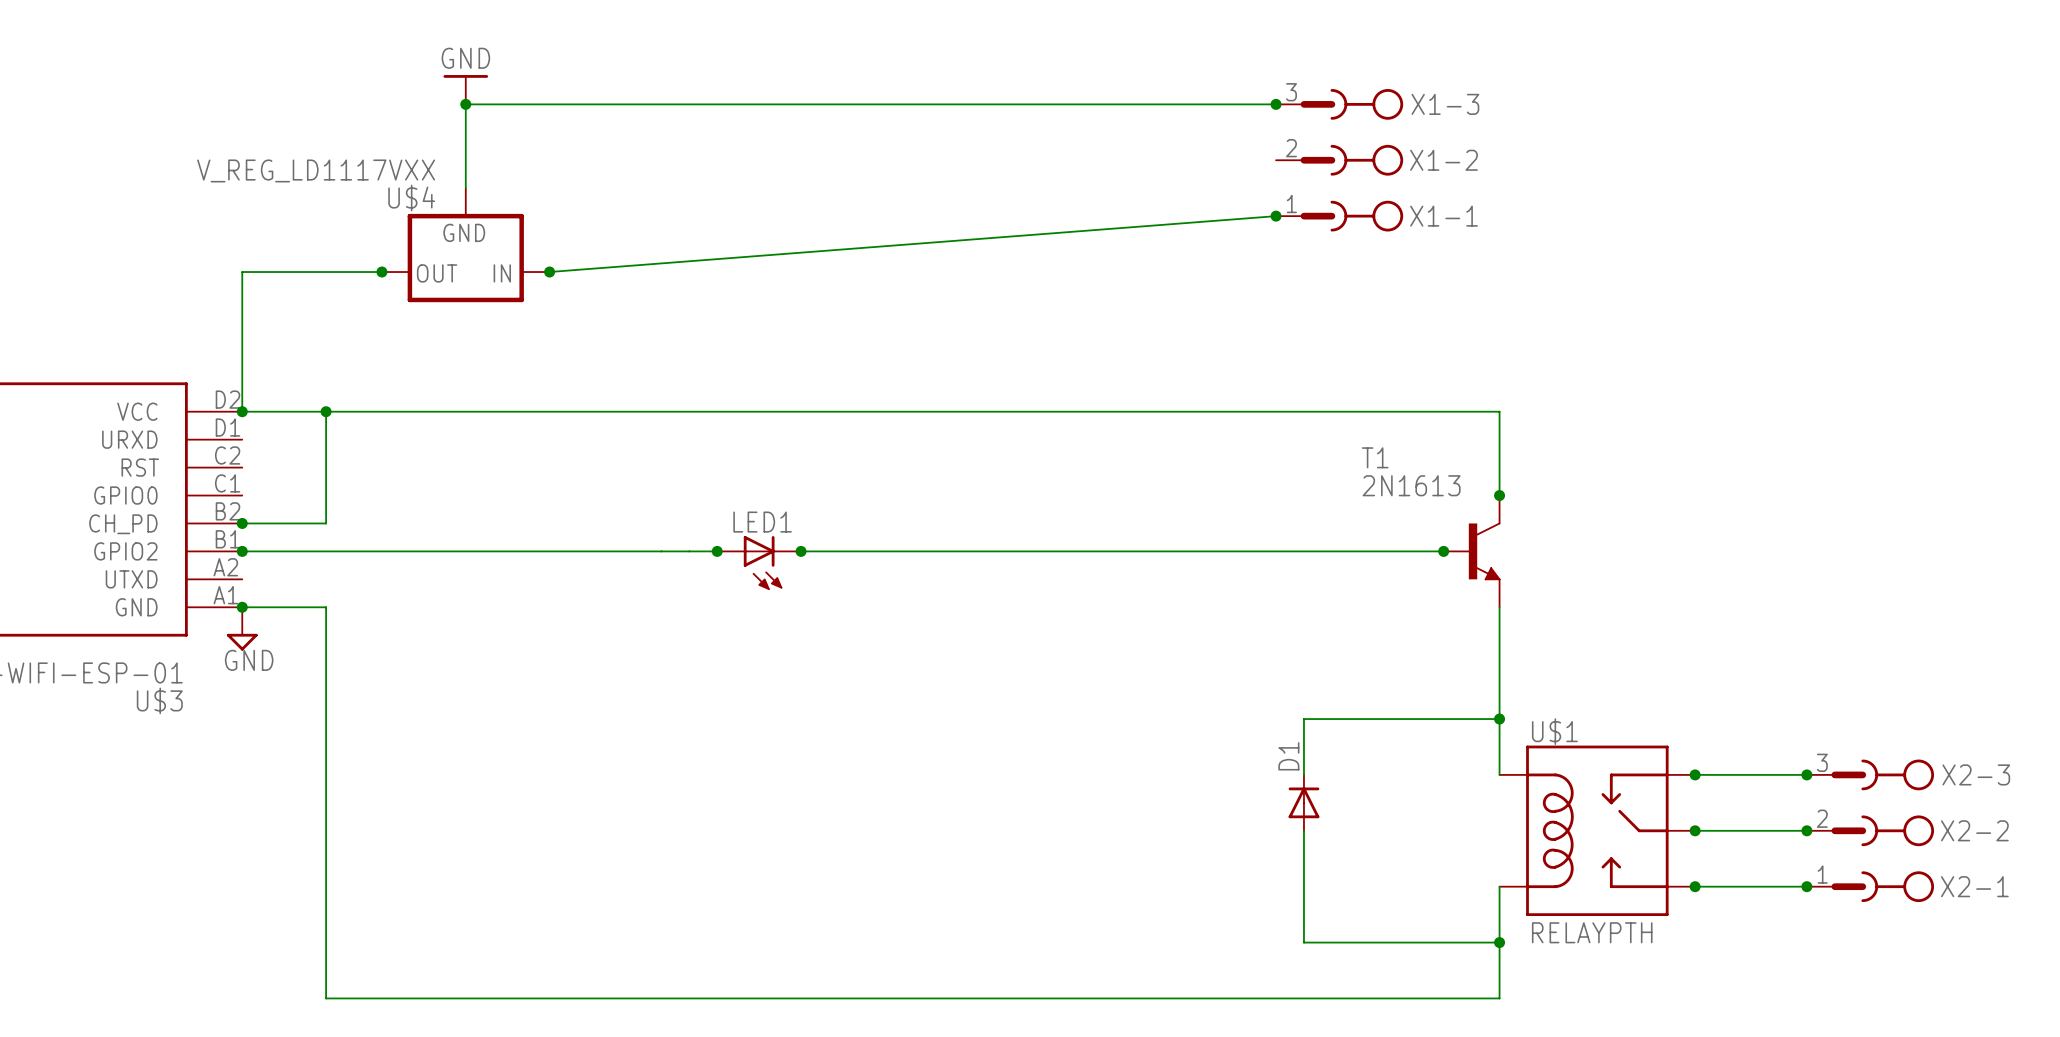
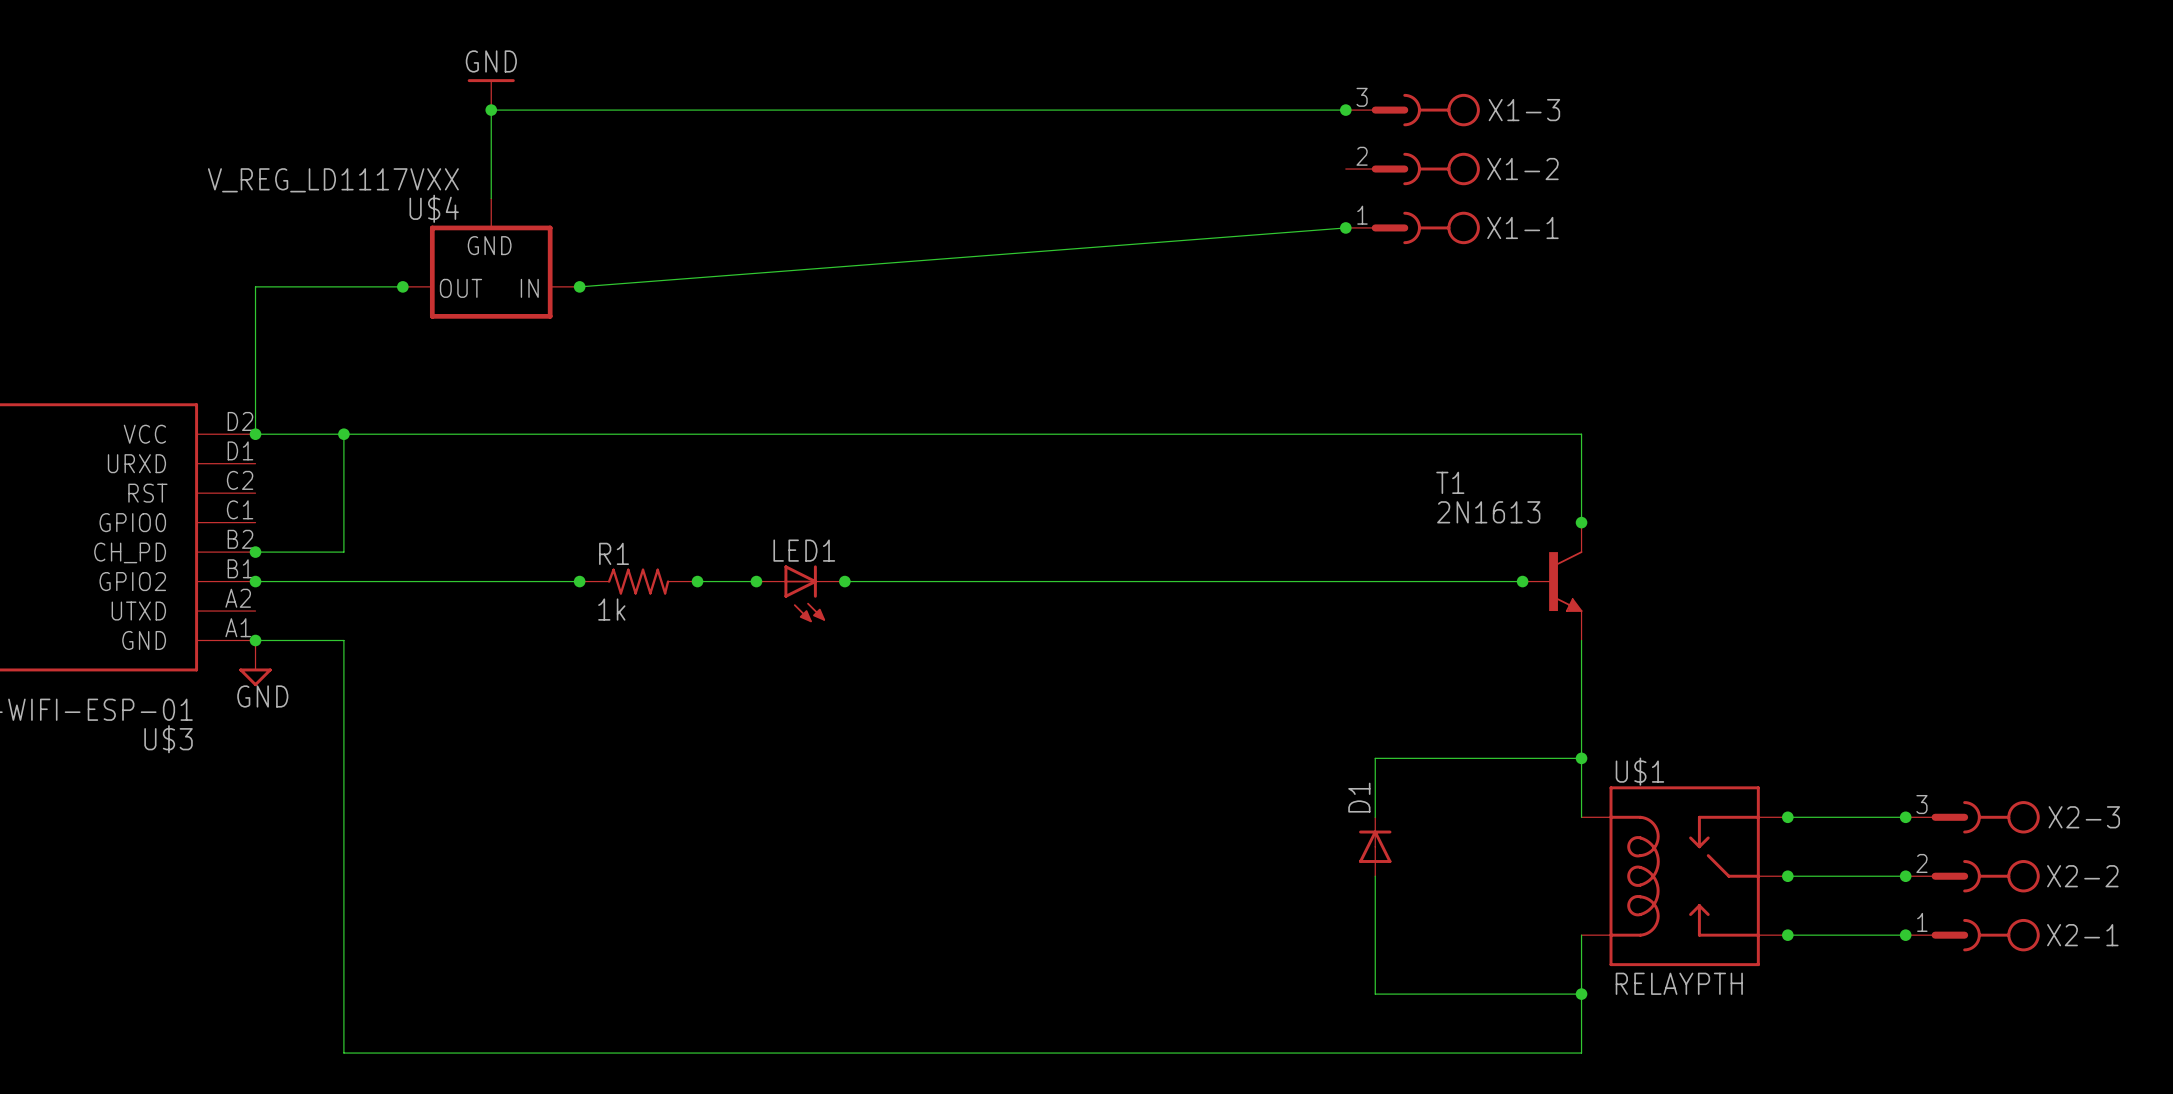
junction: none -> (579, 581)
R1: none -> 1k (638, 581)
junction: none -> (697, 581)

